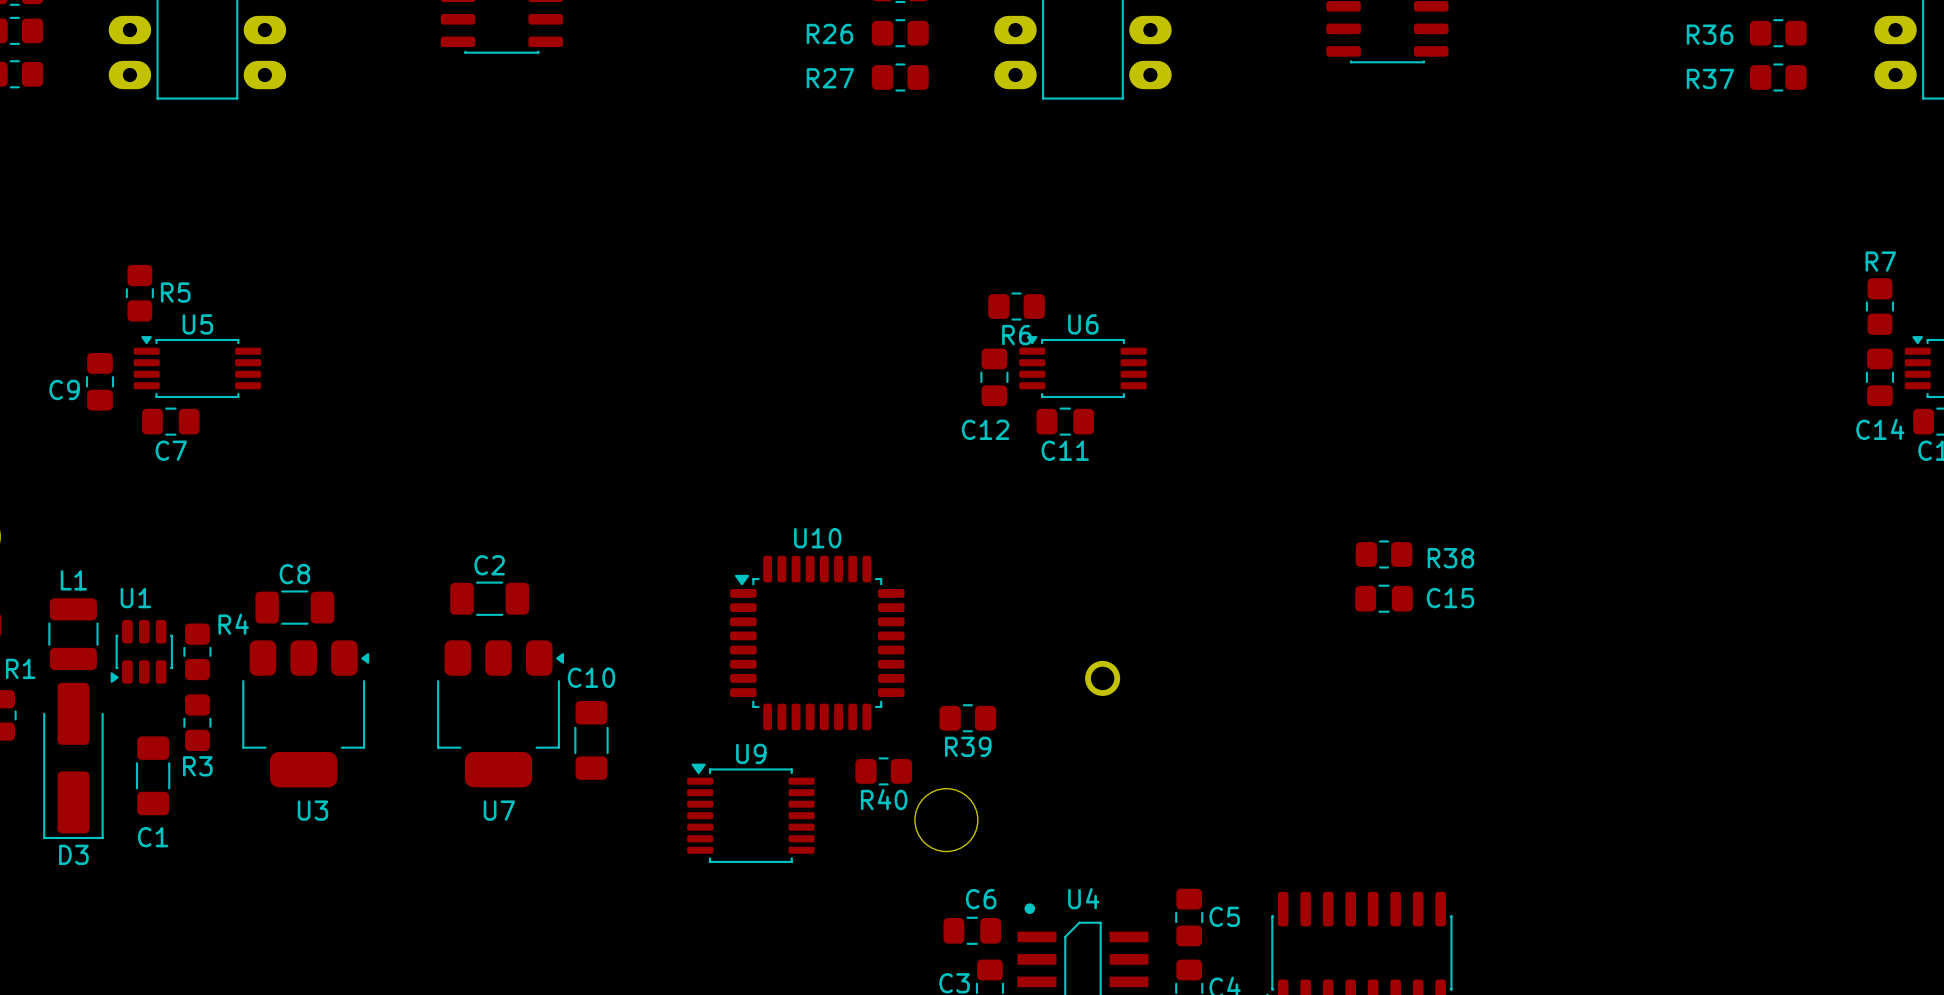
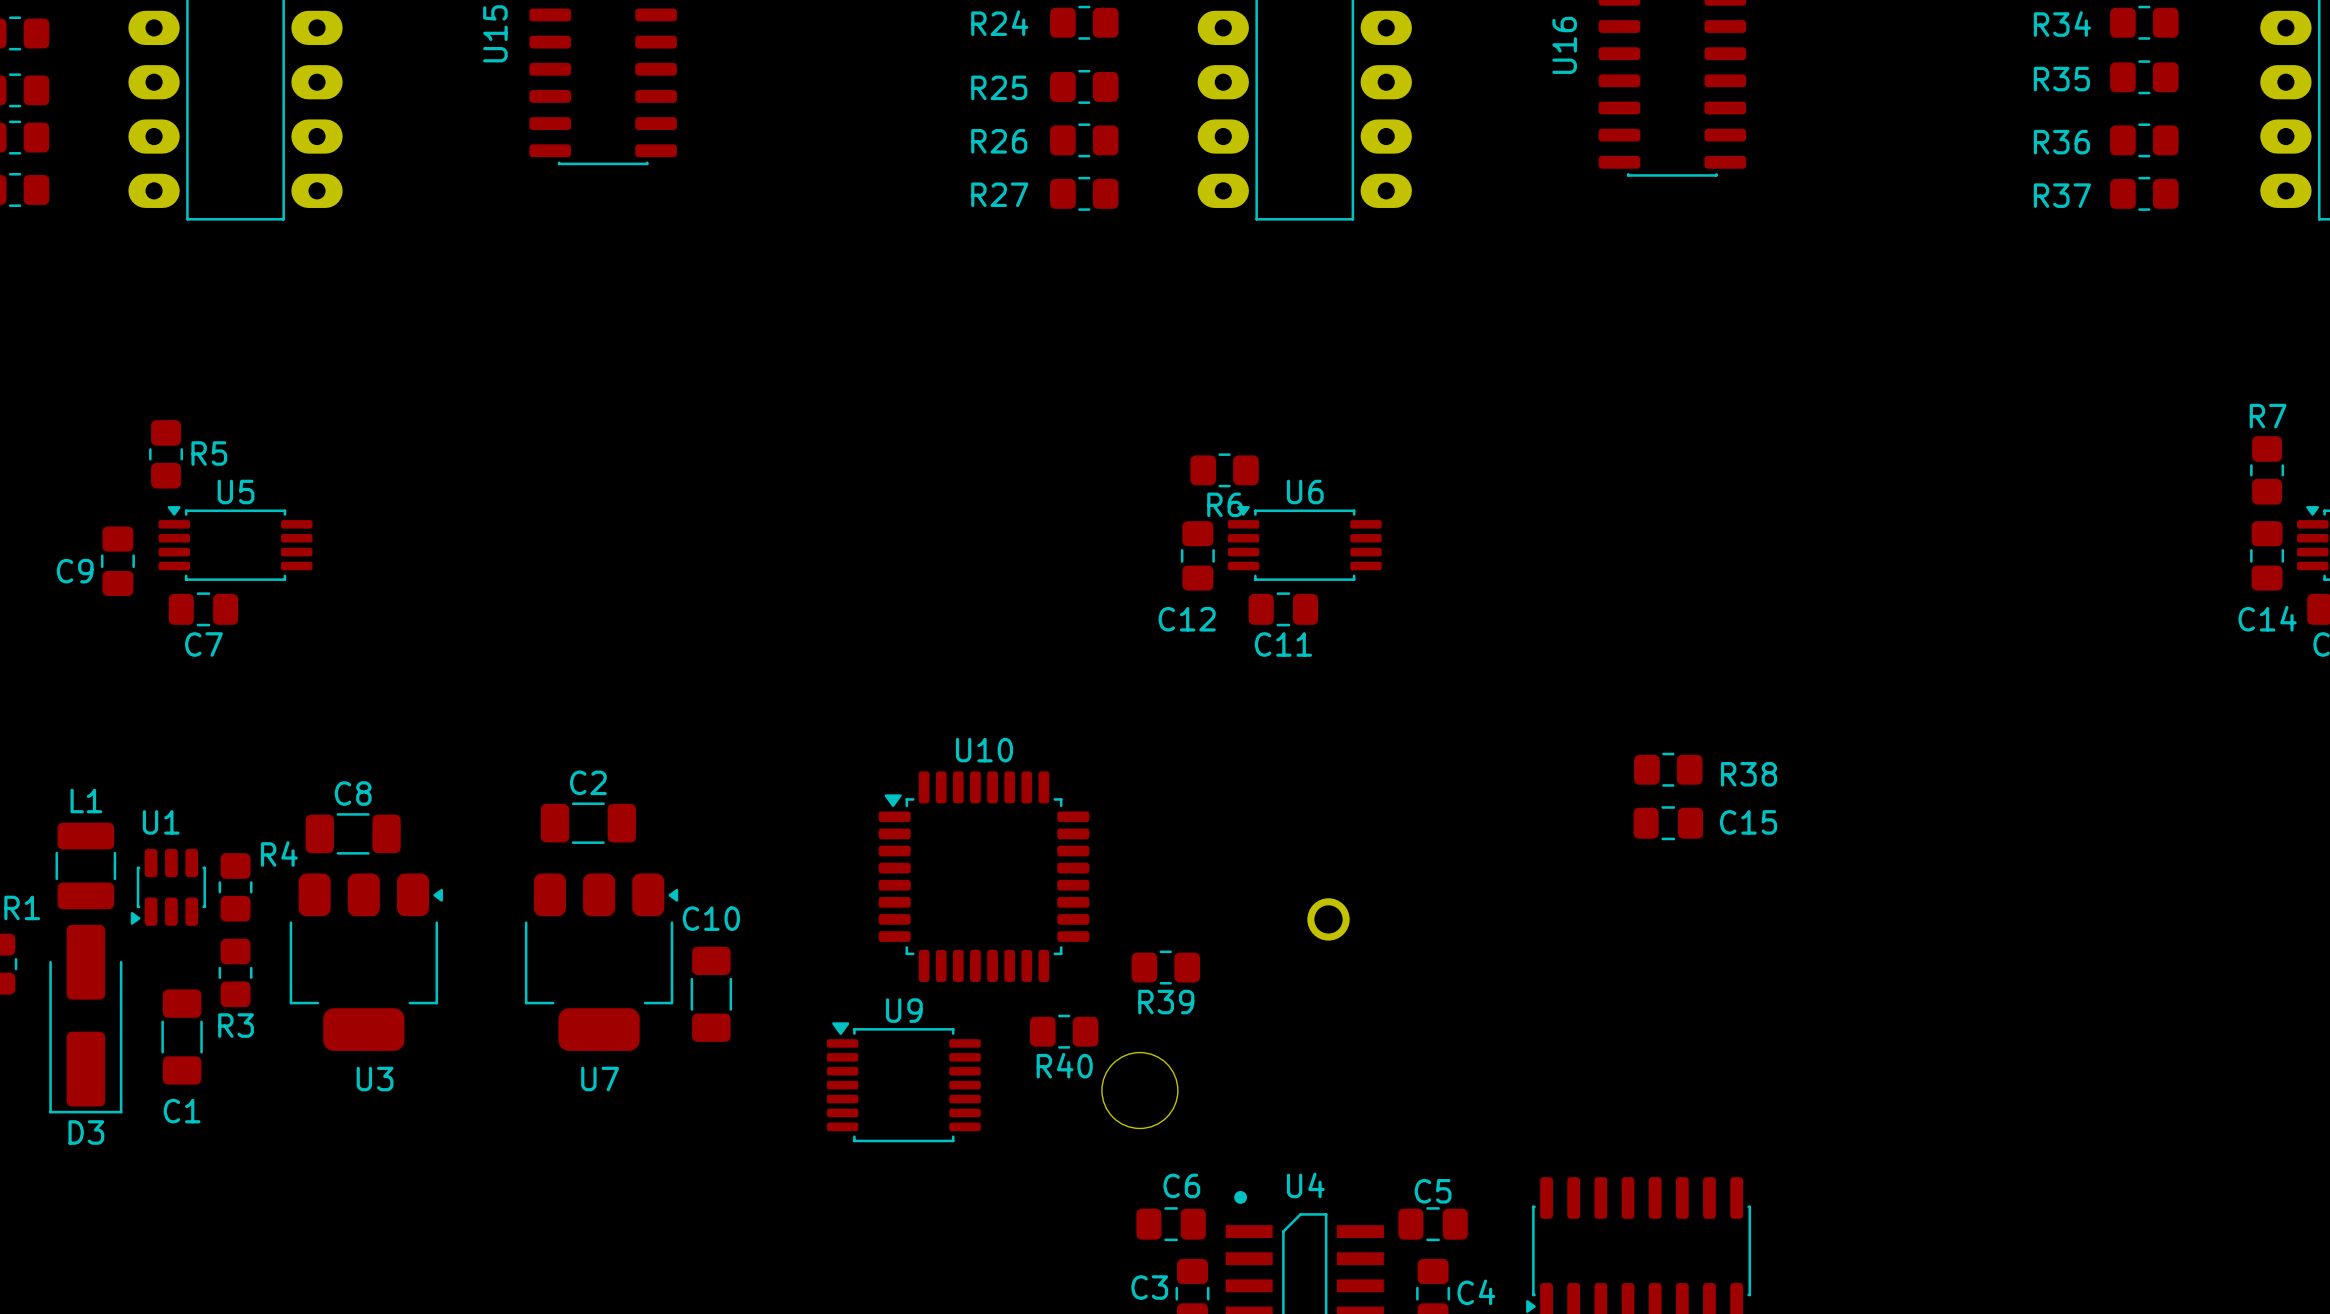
C5 name position: C5 (1224, 916) -> C5 (1433, 1191)
C5 rotation: 0° (1189, 917) -> 90° clockwise (1433, 1224)

